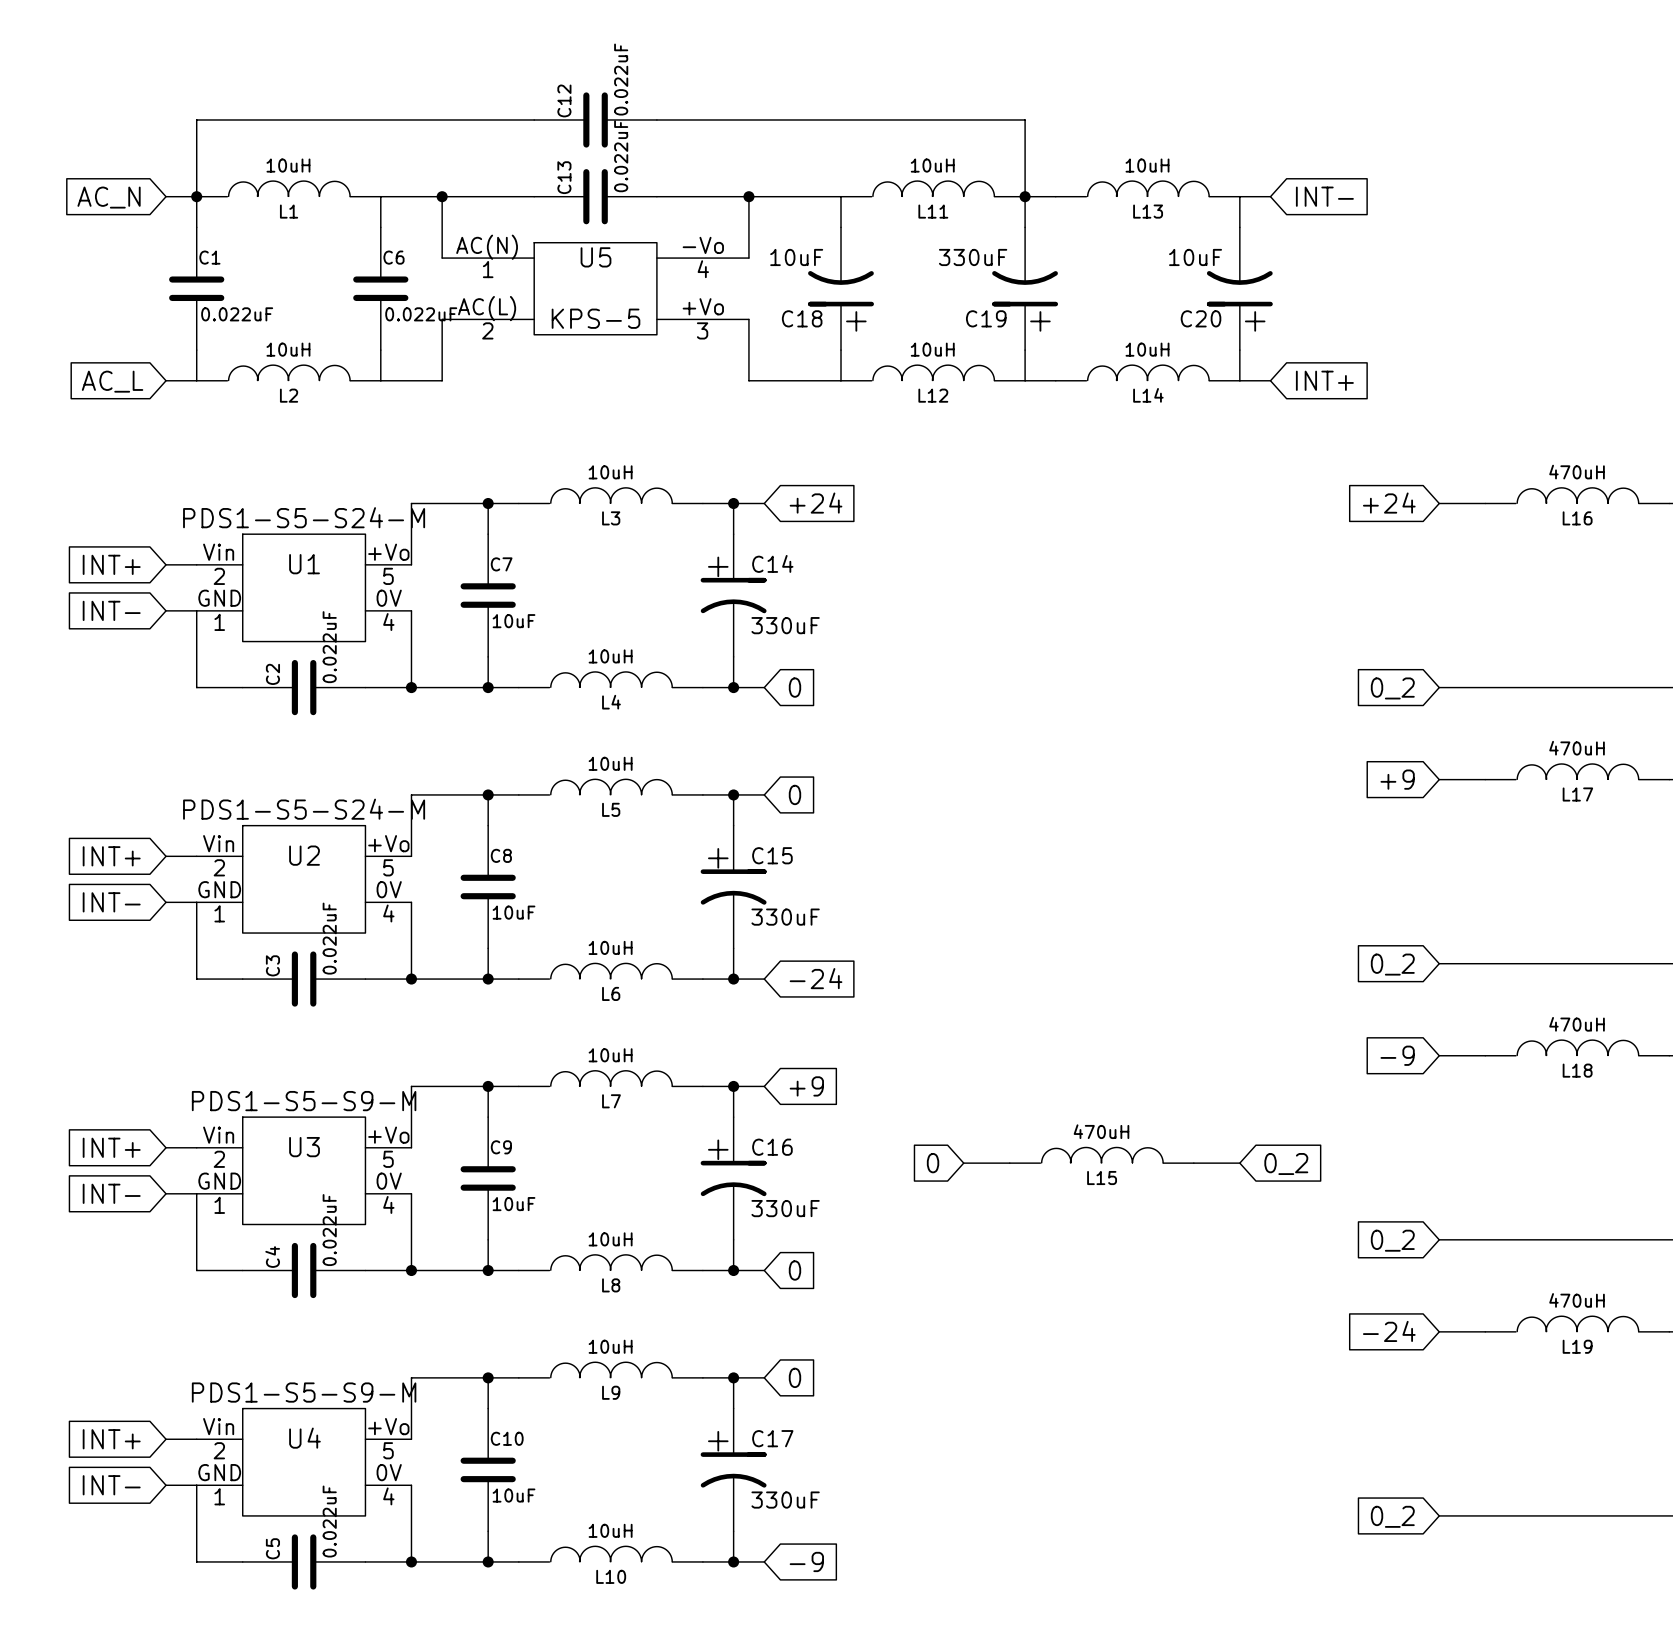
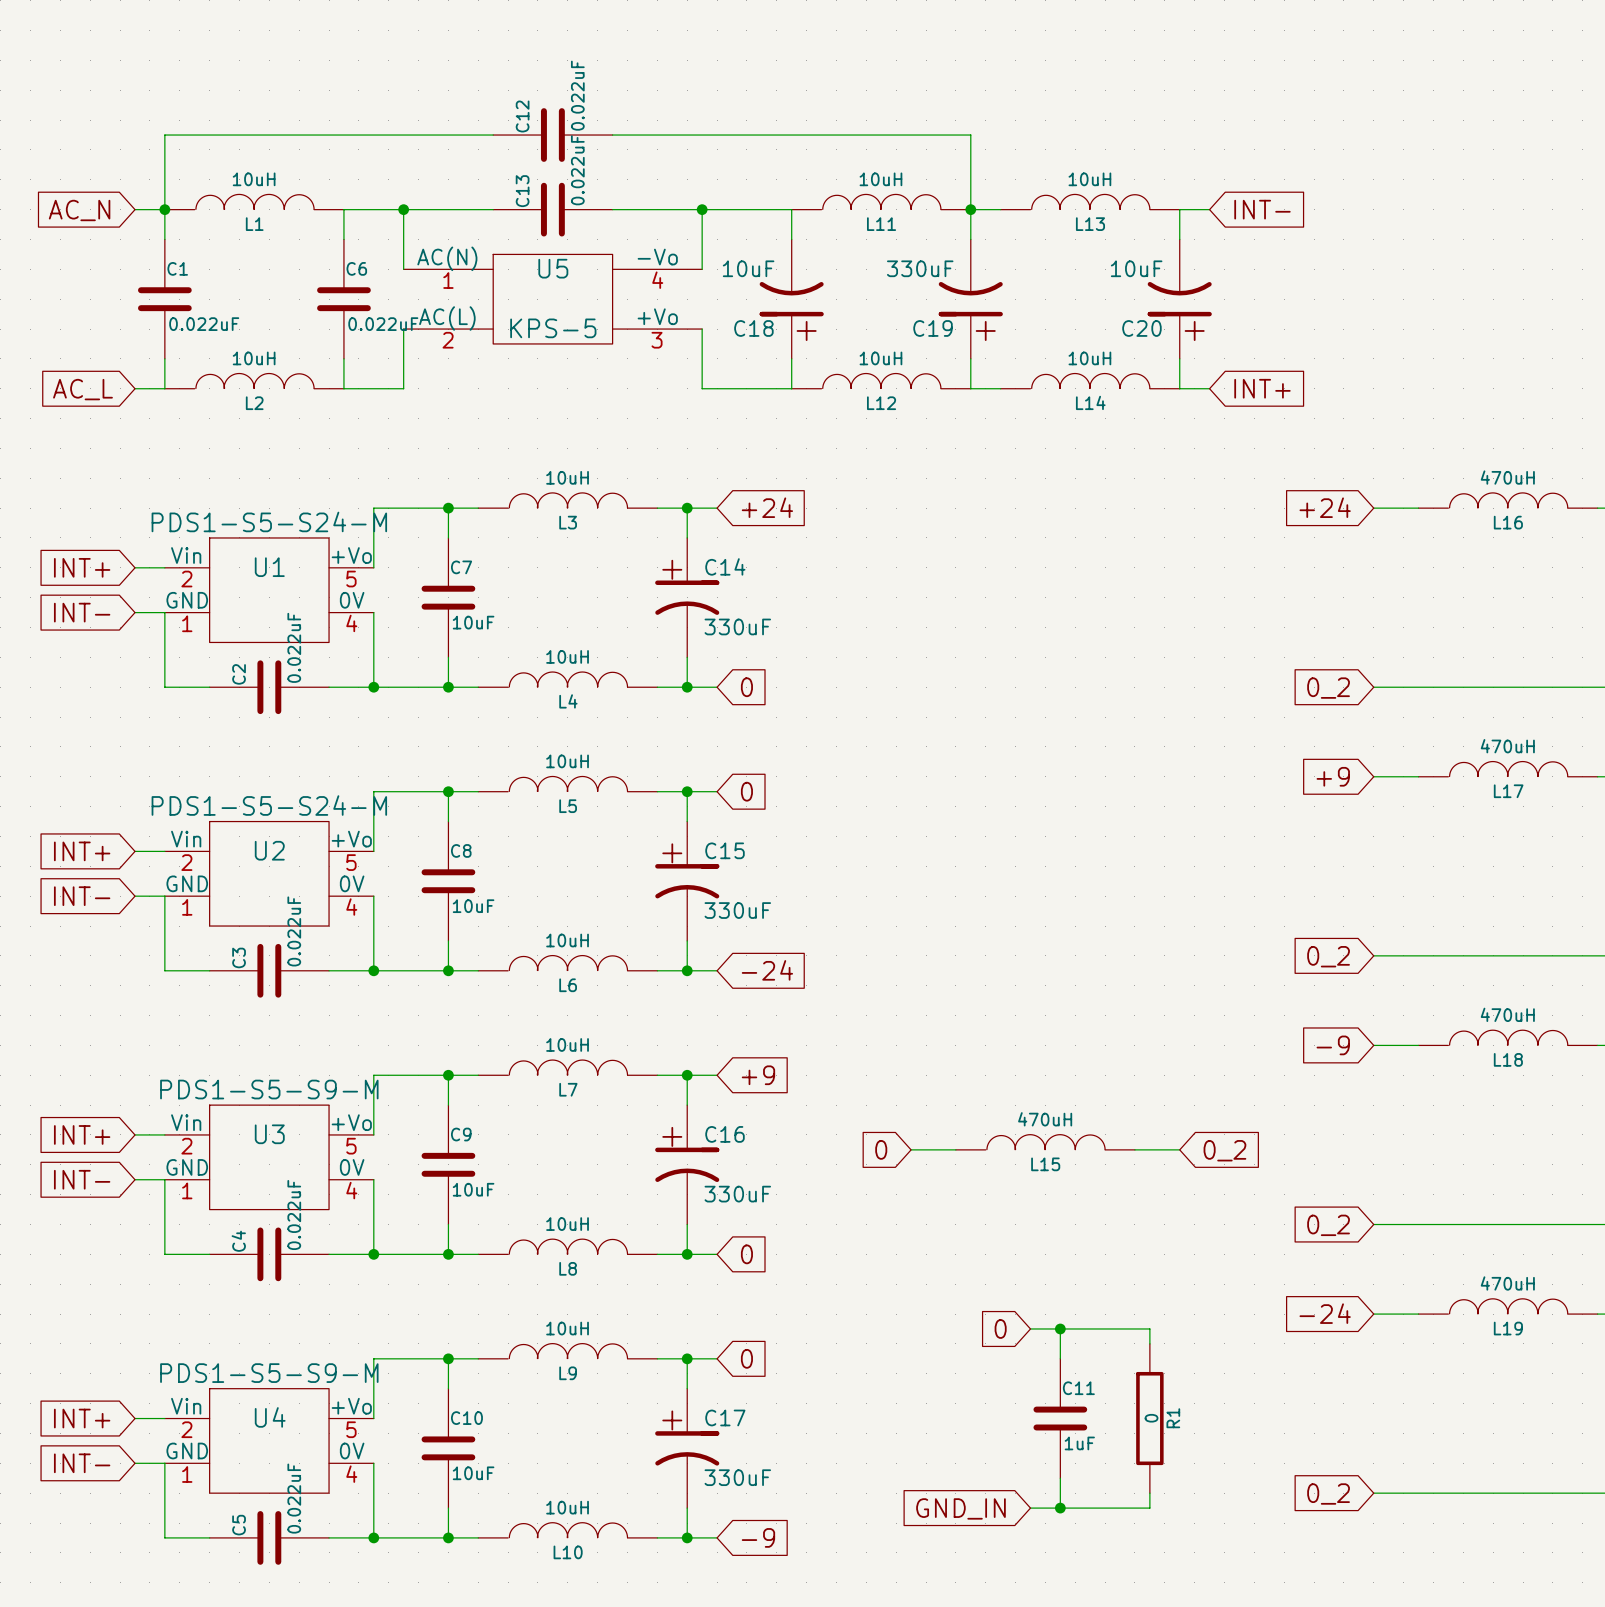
global label: none -> 0 (1000, 1328)
wire: none -> (1030, 1328) (1149, 1328) (1149, 1343)
wire: none -> (1060, 1328) (1060, 1358)
junction: none -> (1060, 1328)
C11: none -> 1uF (1060, 1418)
R1: none -> 0 (1149, 1418)
wire: none -> (1060, 1478) (1060, 1508)
wire: none -> (1149, 1493) (1149, 1508) (1030, 1508)
junction: none -> (1060, 1508)
global label: none -> GND_IN (960, 1508)

